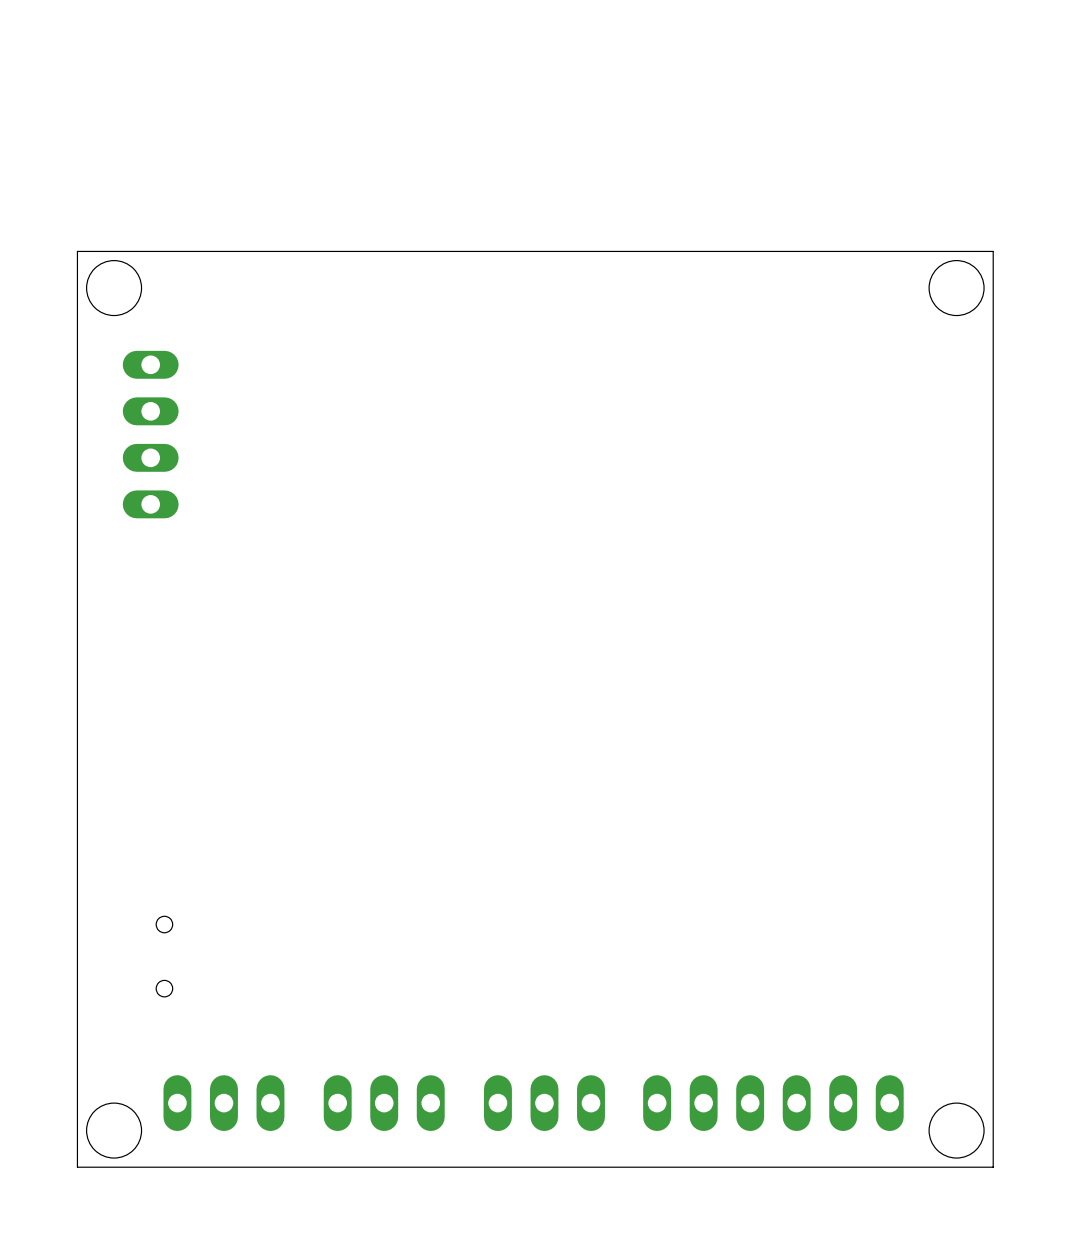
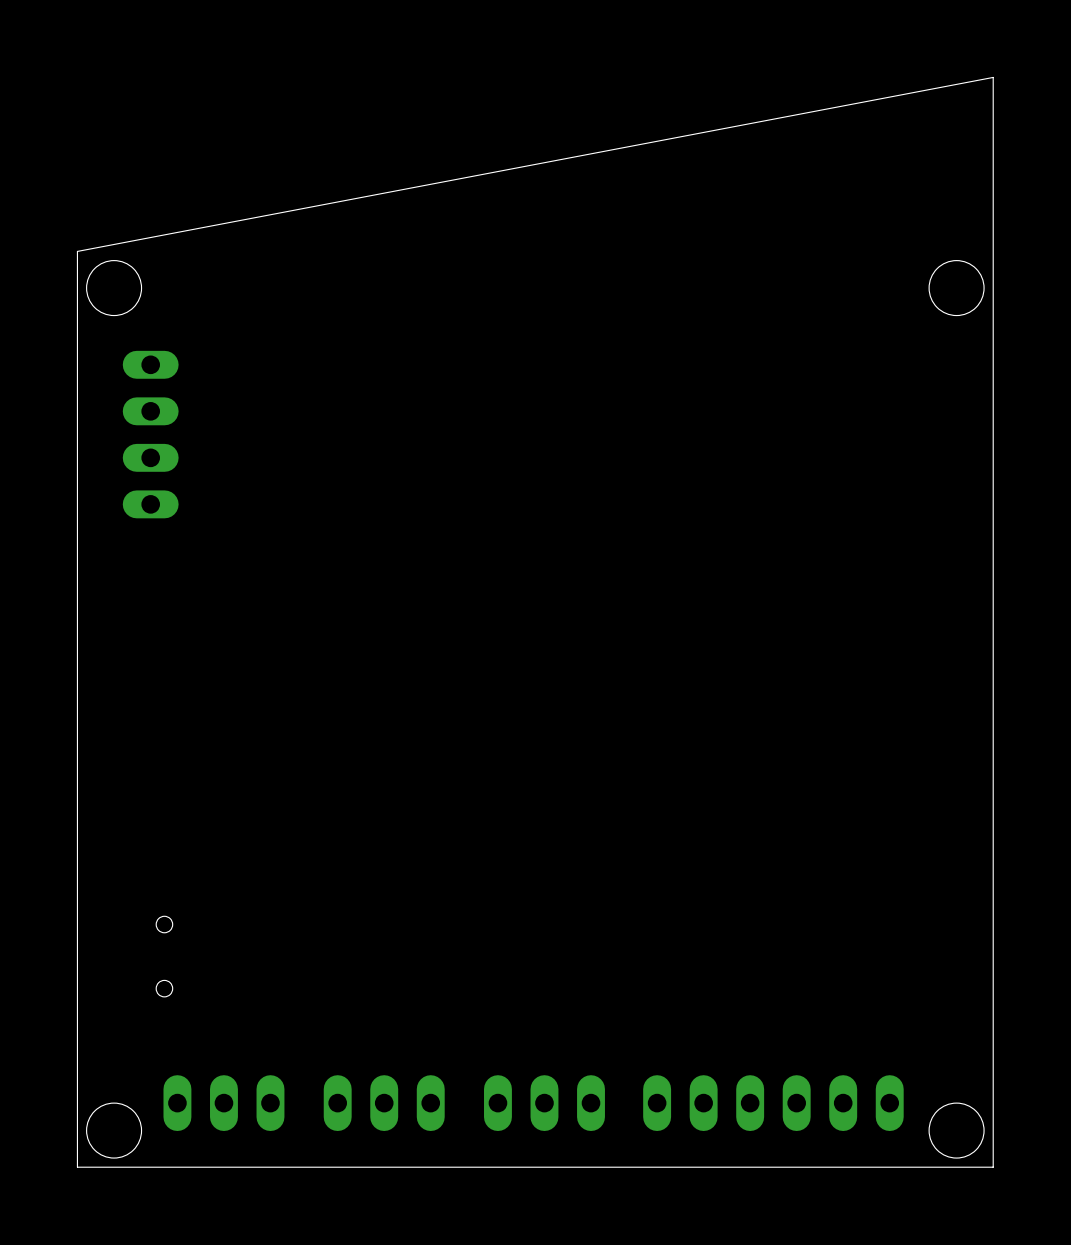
board edge: (993, 251) (77, 251) -> (993, 251) (993, 77) (77, 251)

